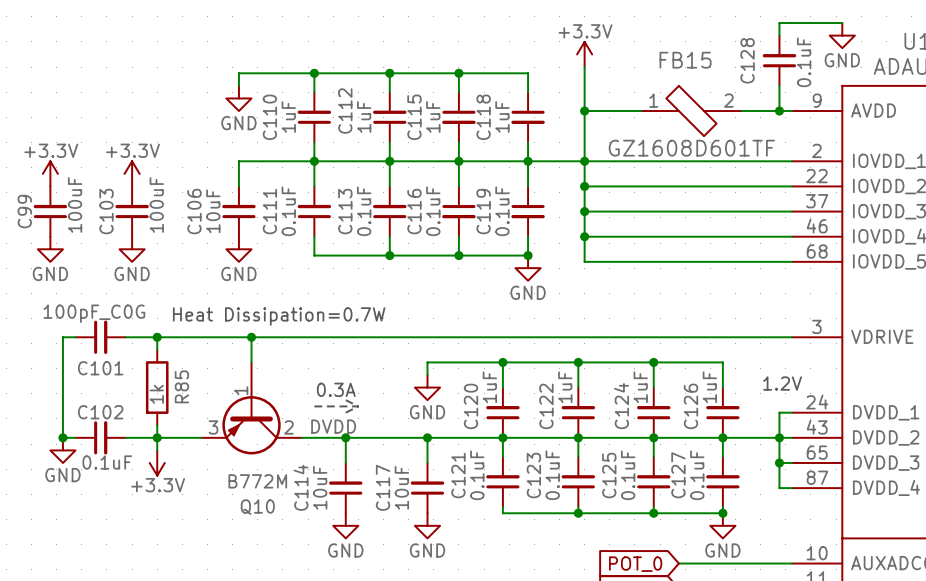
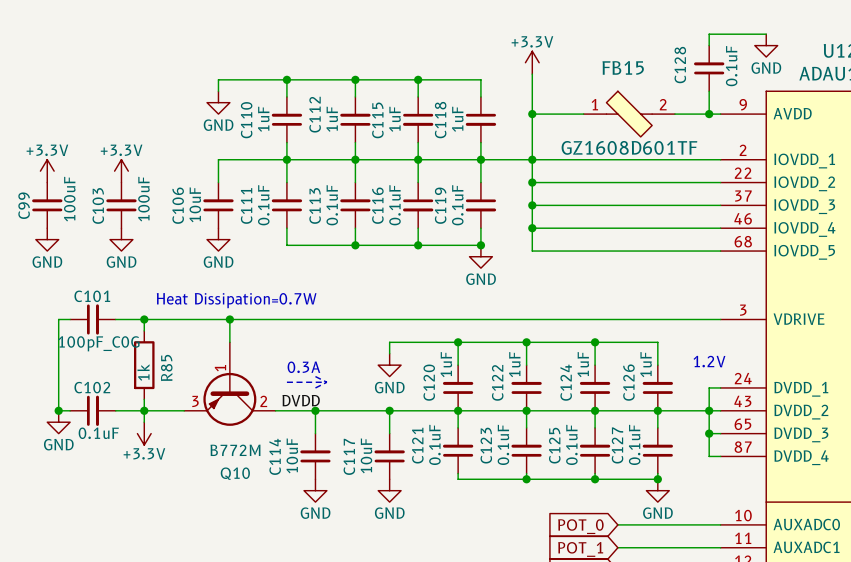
C101 value position: 100pF_C0G (94, 313) -> 100pF_C0G (99, 343)
C101 name position: C101 (100, 368) -> C101 (92, 296)

